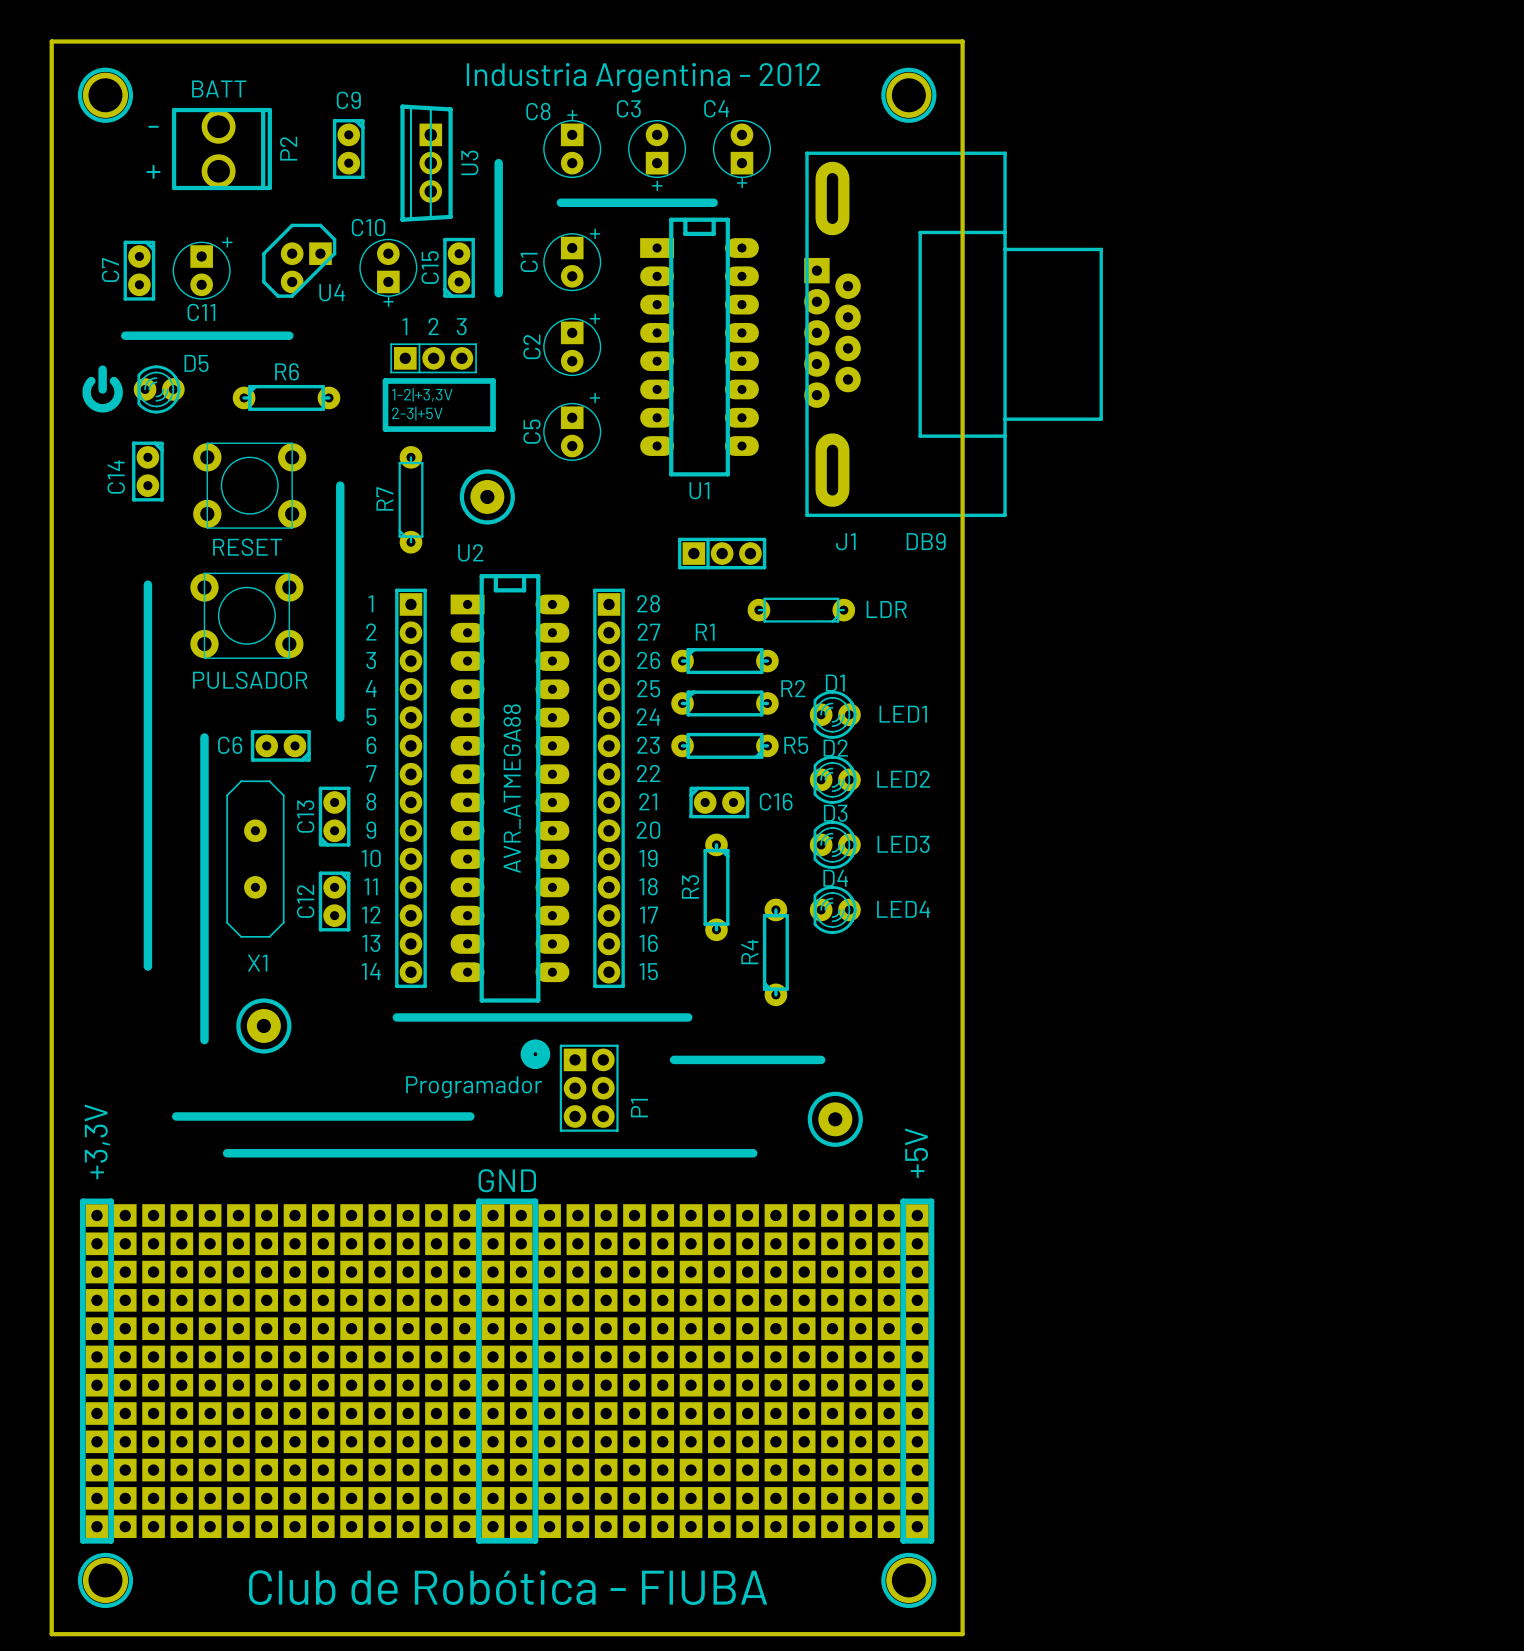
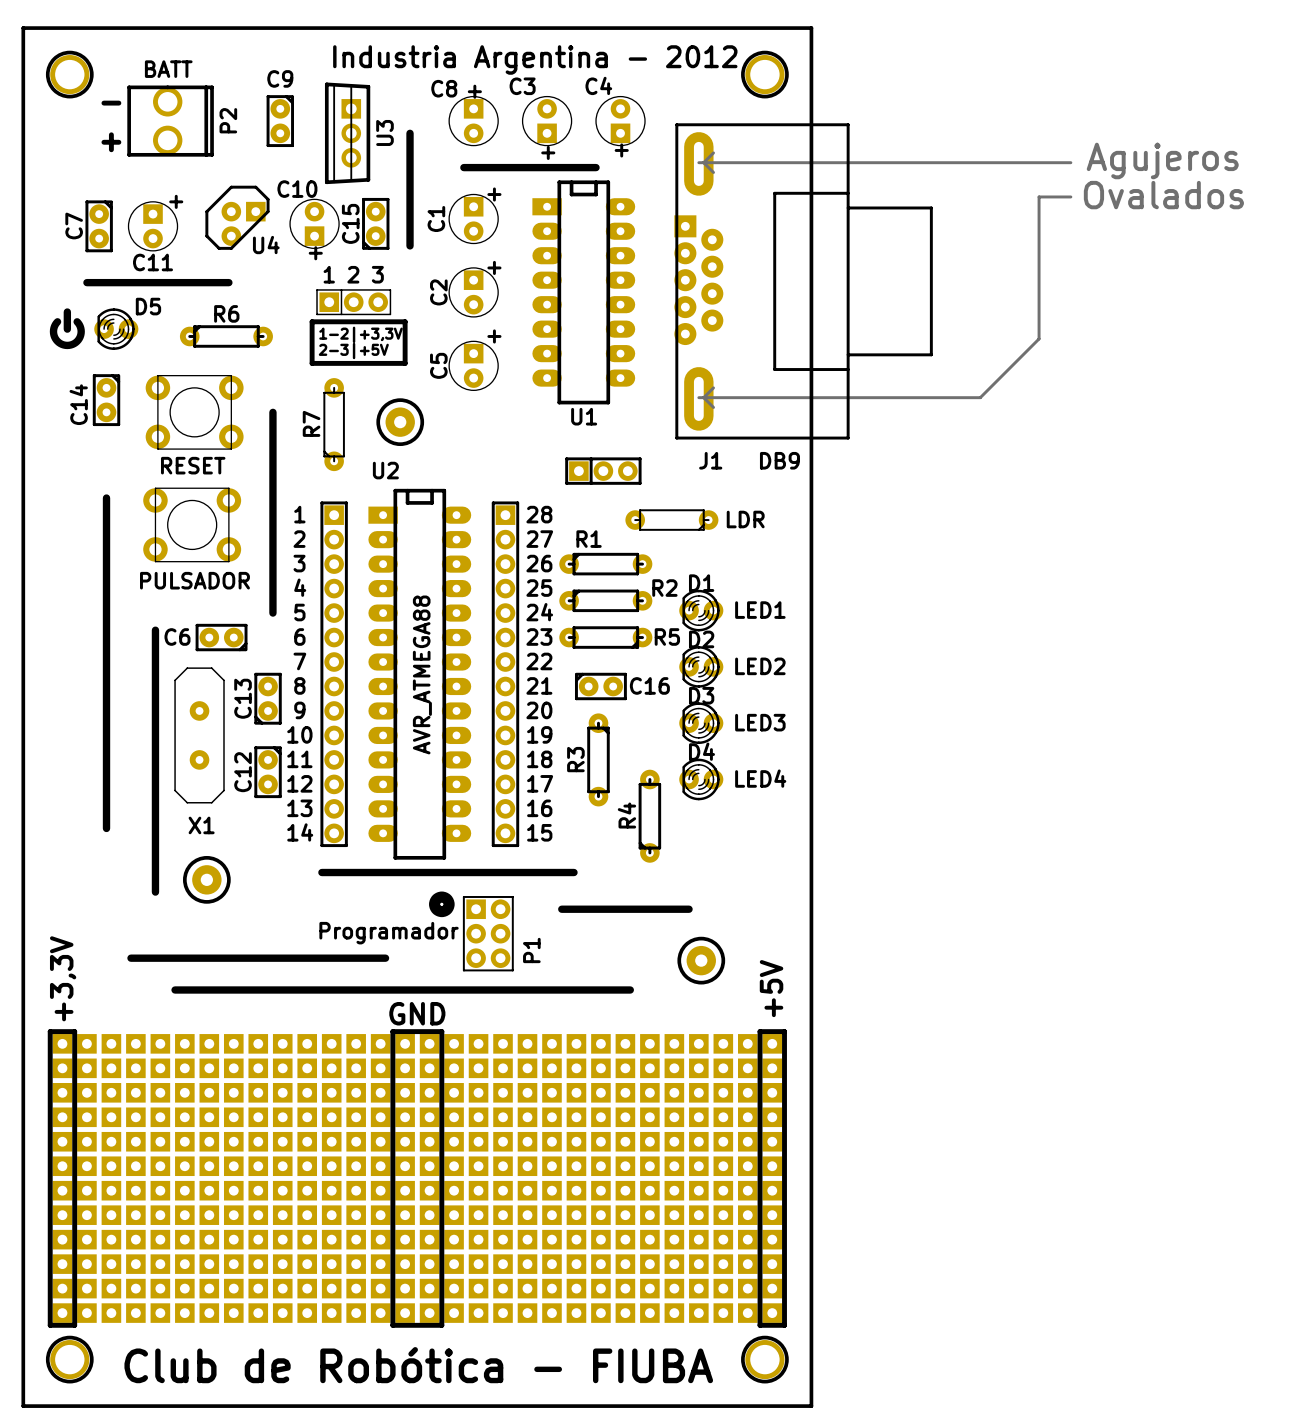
line: none -> (713, 152) (703, 162) (713, 172)
text: none -> Agujeros (1162, 160)
line: none -> (698, 162) (1070, 162)
text: none -> Ovalados (1163, 195)
line: none -> (1070, 196) (1039, 196) (1039, 338) (980, 397) (698, 397)
line: none -> (713, 387) (703, 397) (713, 407)

